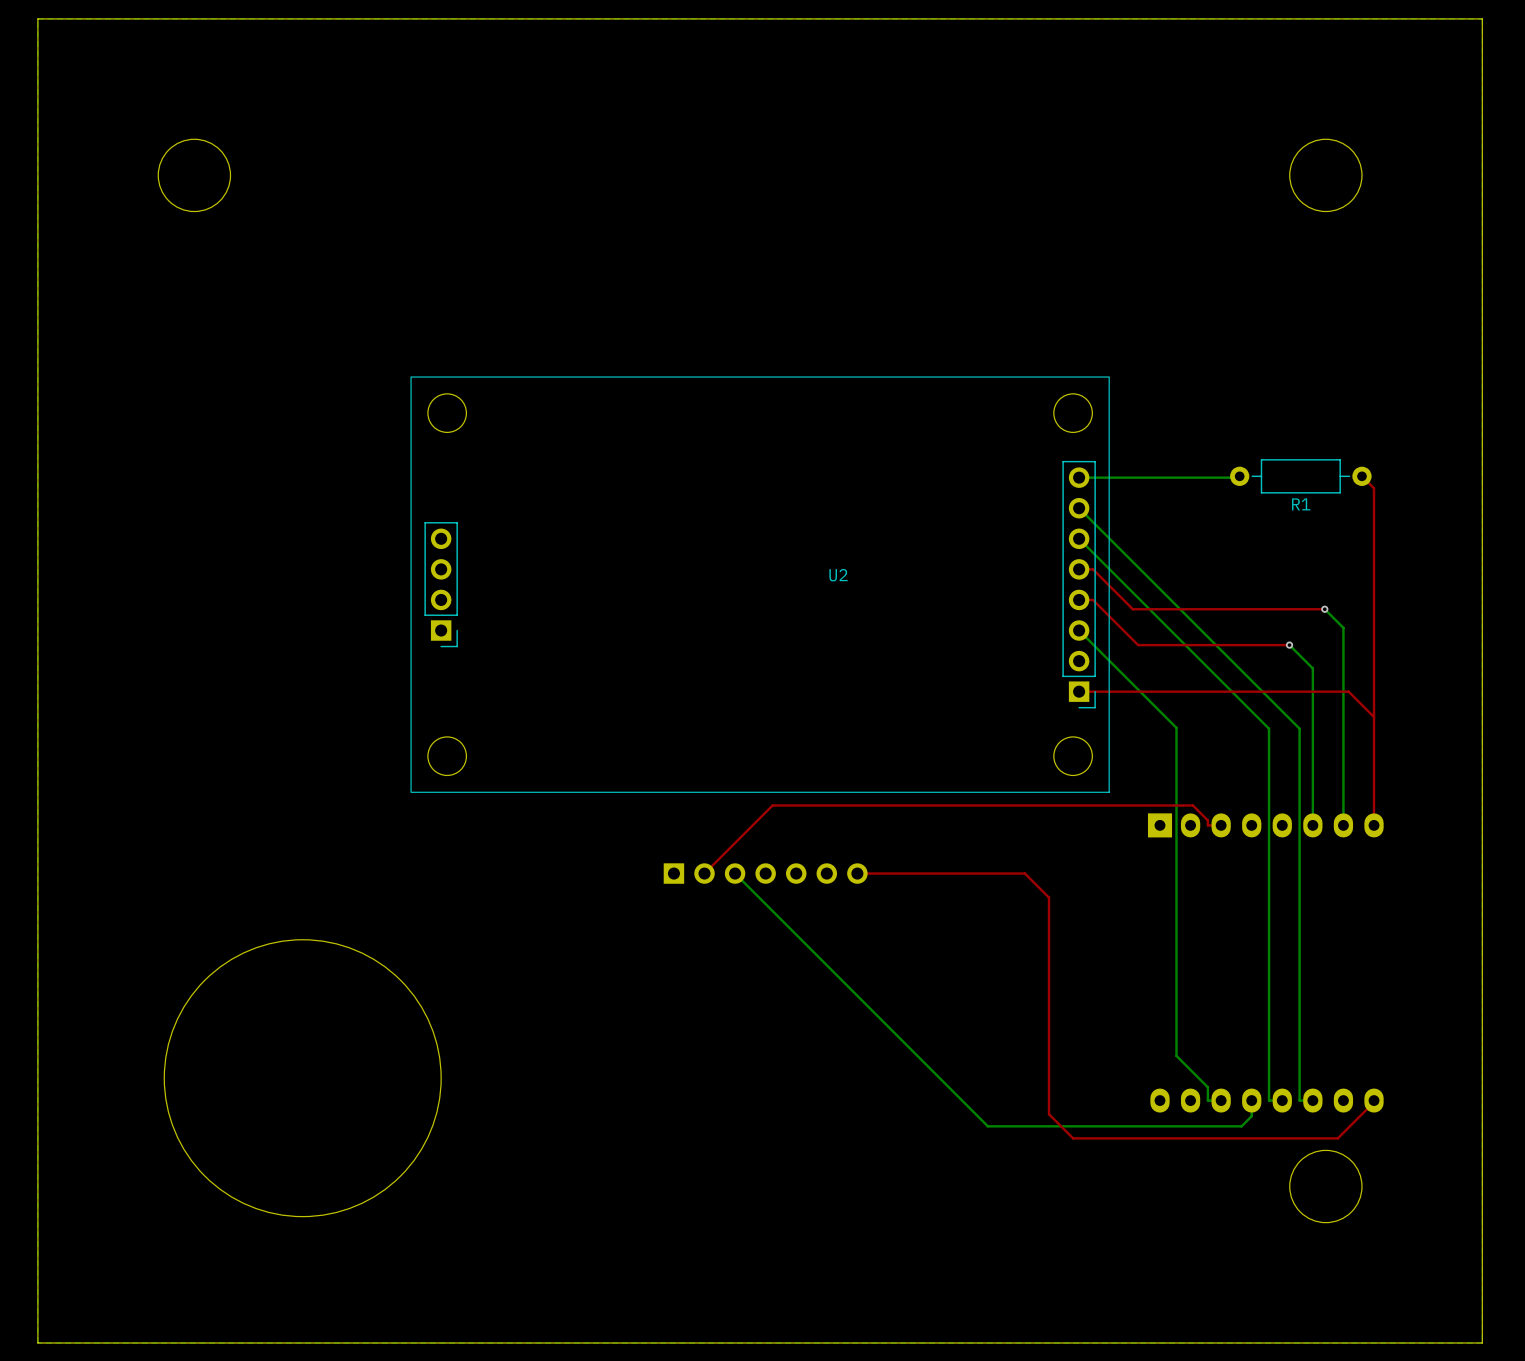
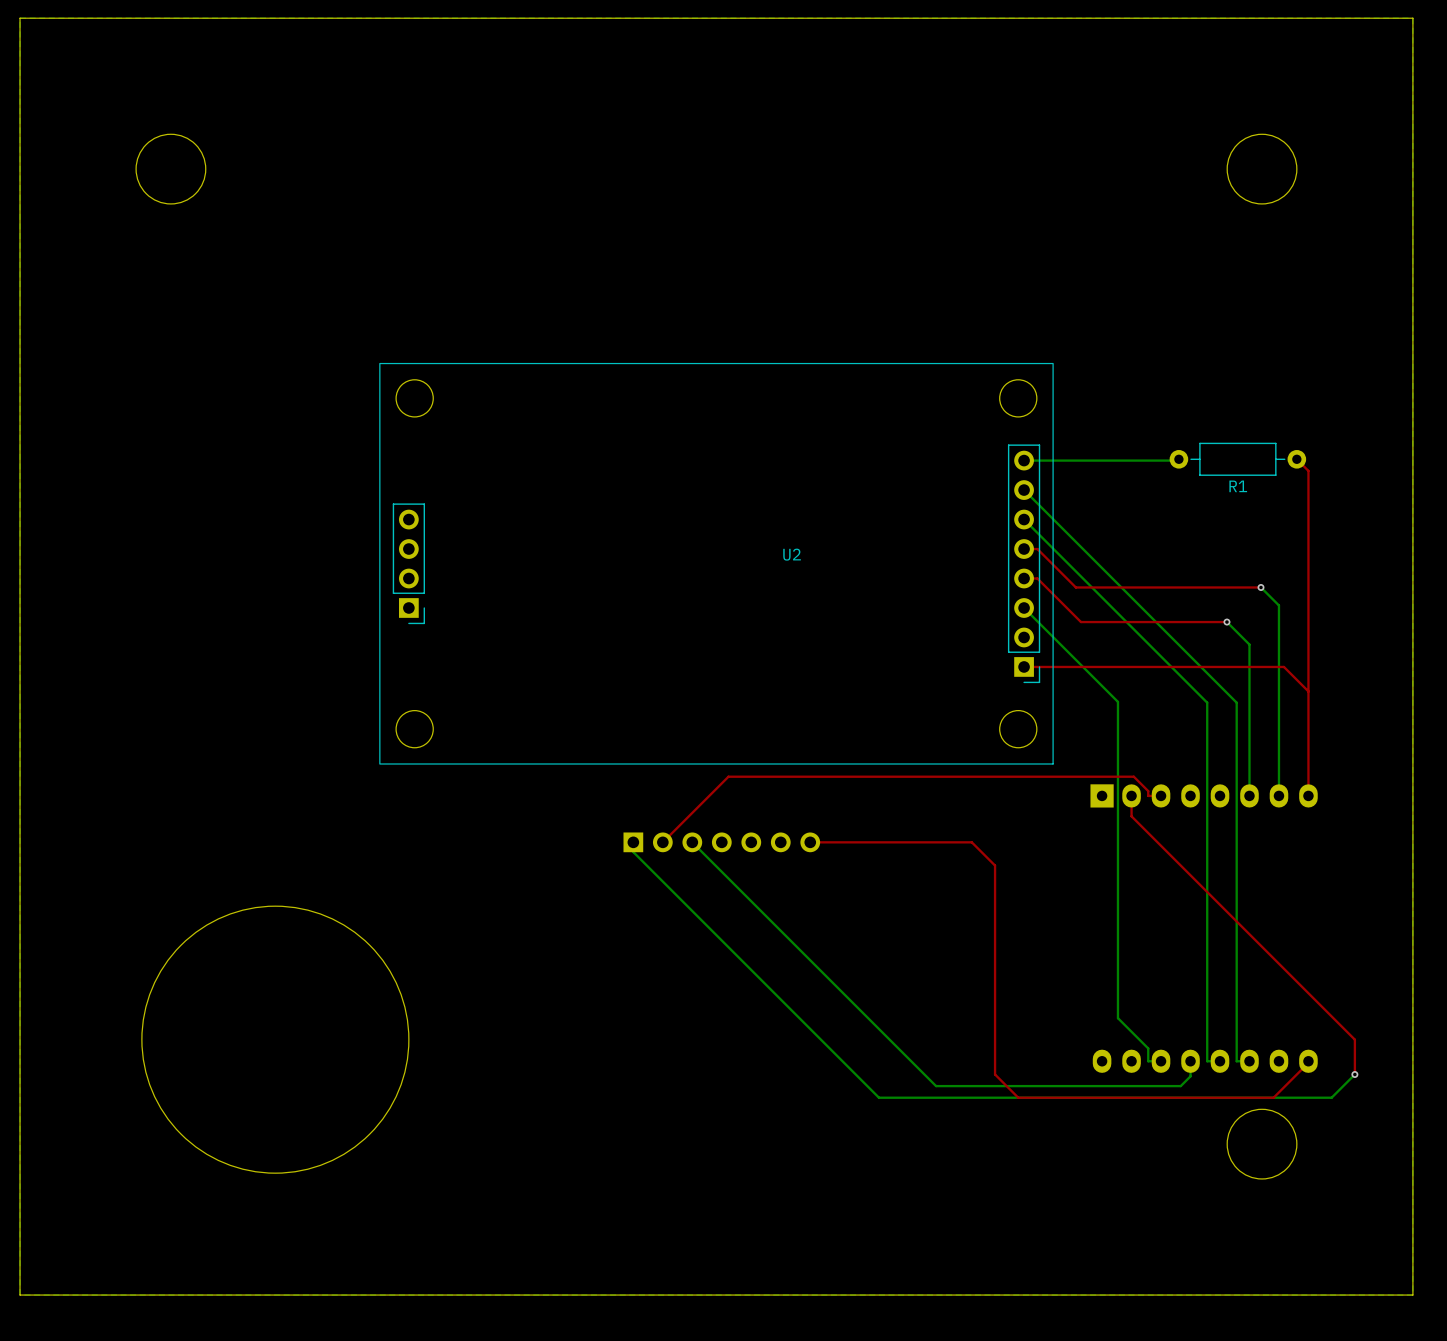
top track: none -> (1131, 795) (1131, 816) (1354, 1039) (1354, 1074)
bottom track: none -> (633, 842) (633, 852) (878, 1097) (1331, 1097) (1354, 1074)
via: none -> (1354, 1074)

